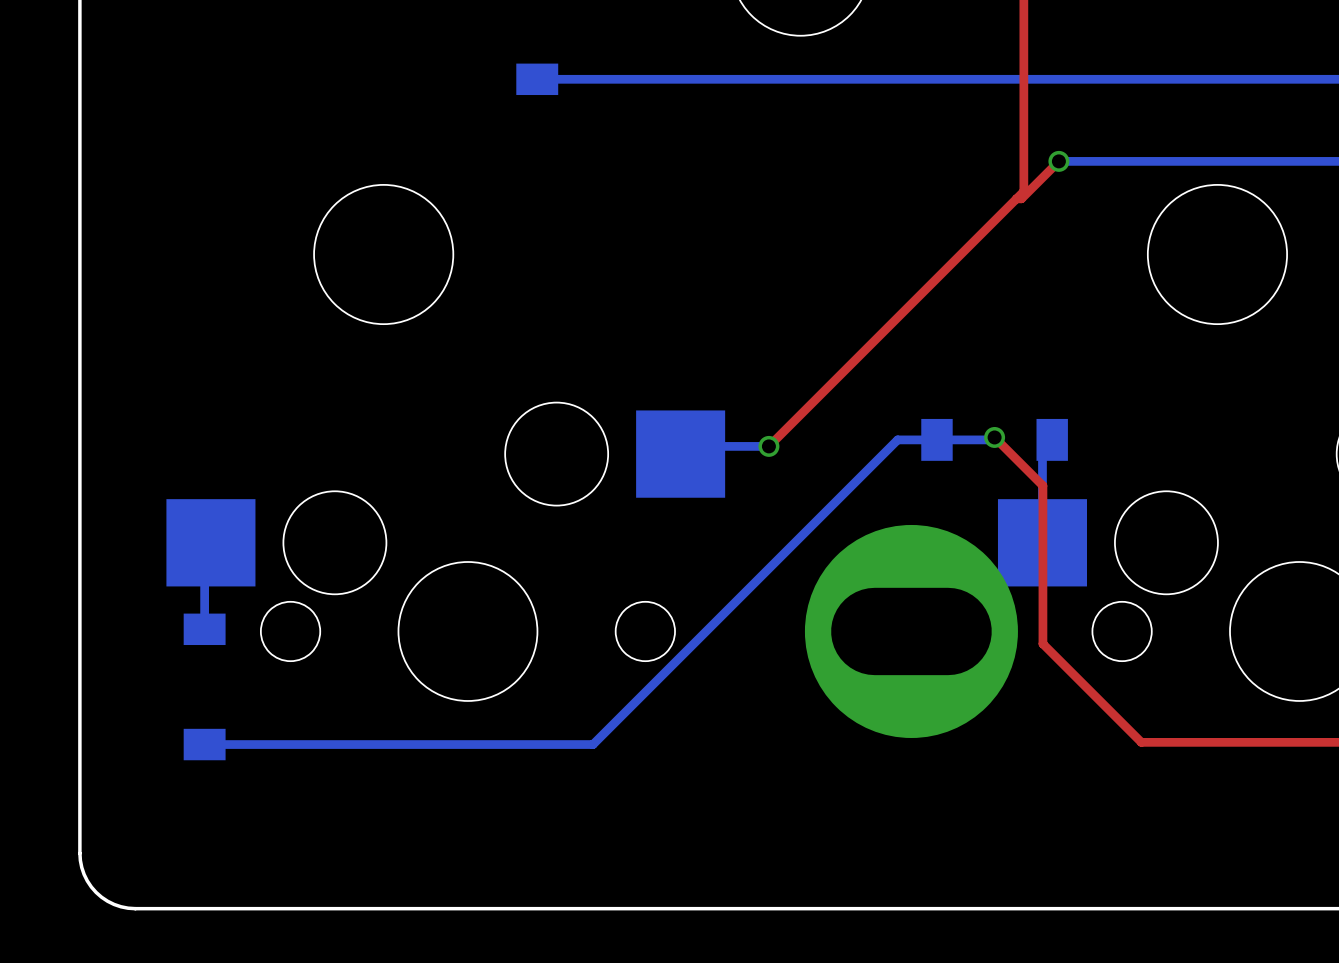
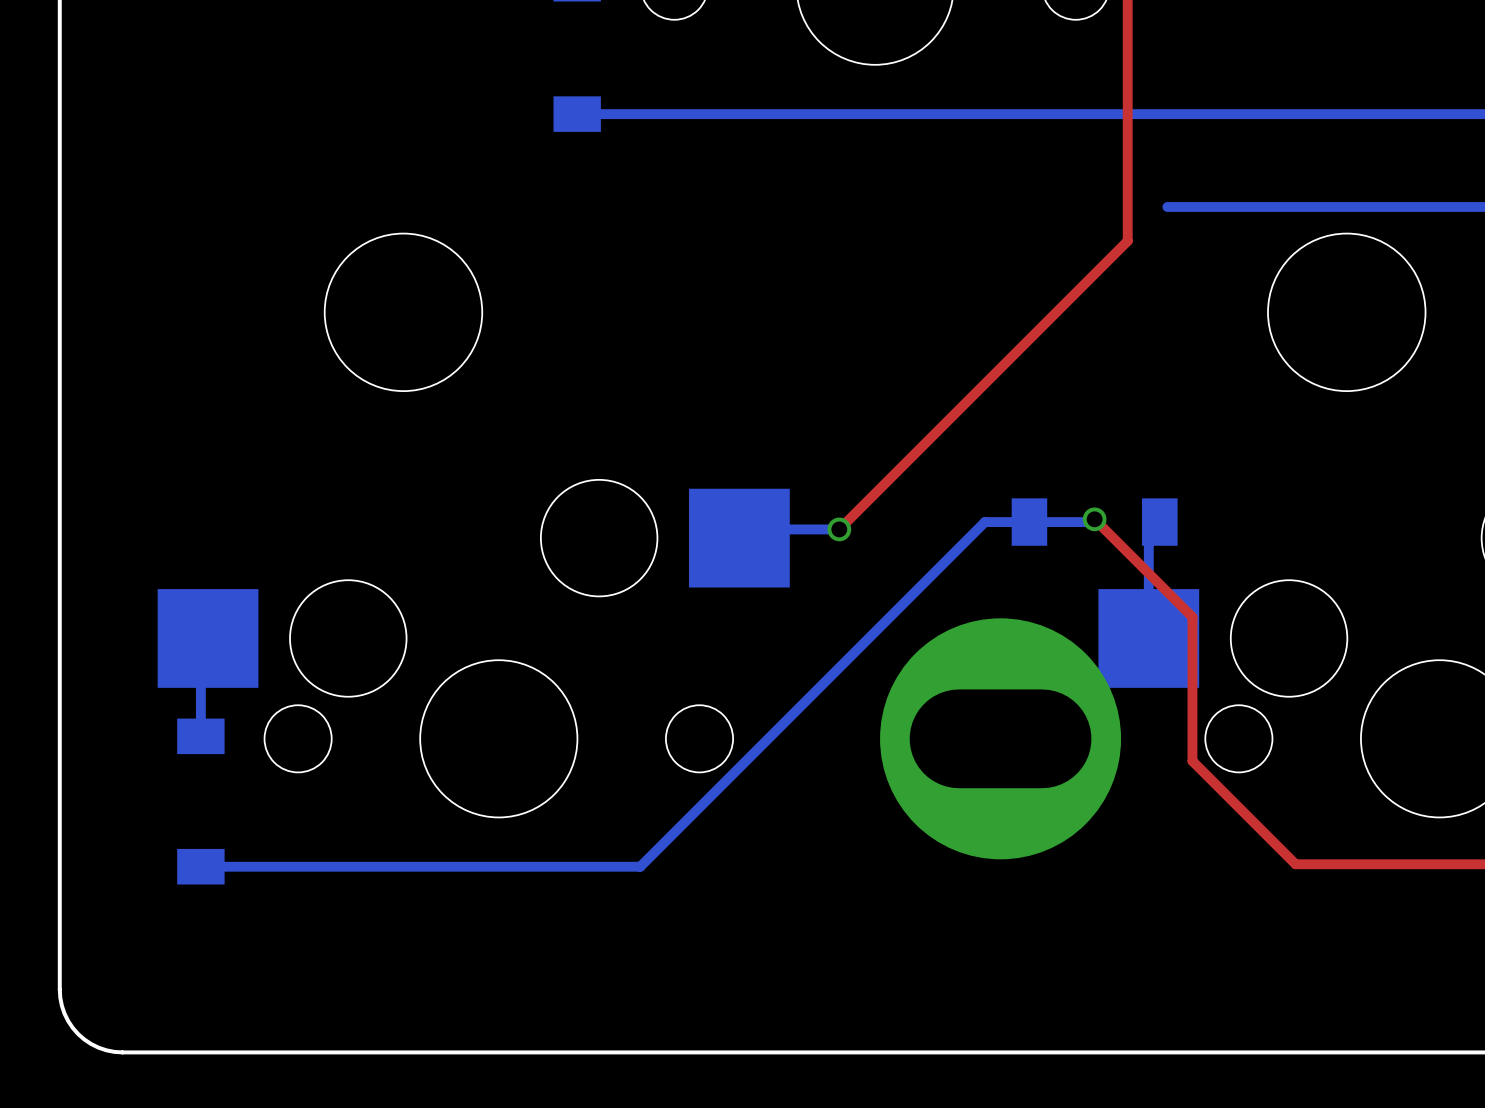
top track: (1058, 161) (1021, 198) (1016, 198) -> none
via: (1058, 161) -> none
top track: (1042, 485) (1042, 643) (1141, 742) (1172, 742) -> (1149, 574) (1192, 617) (1192, 761) (1295, 864)

